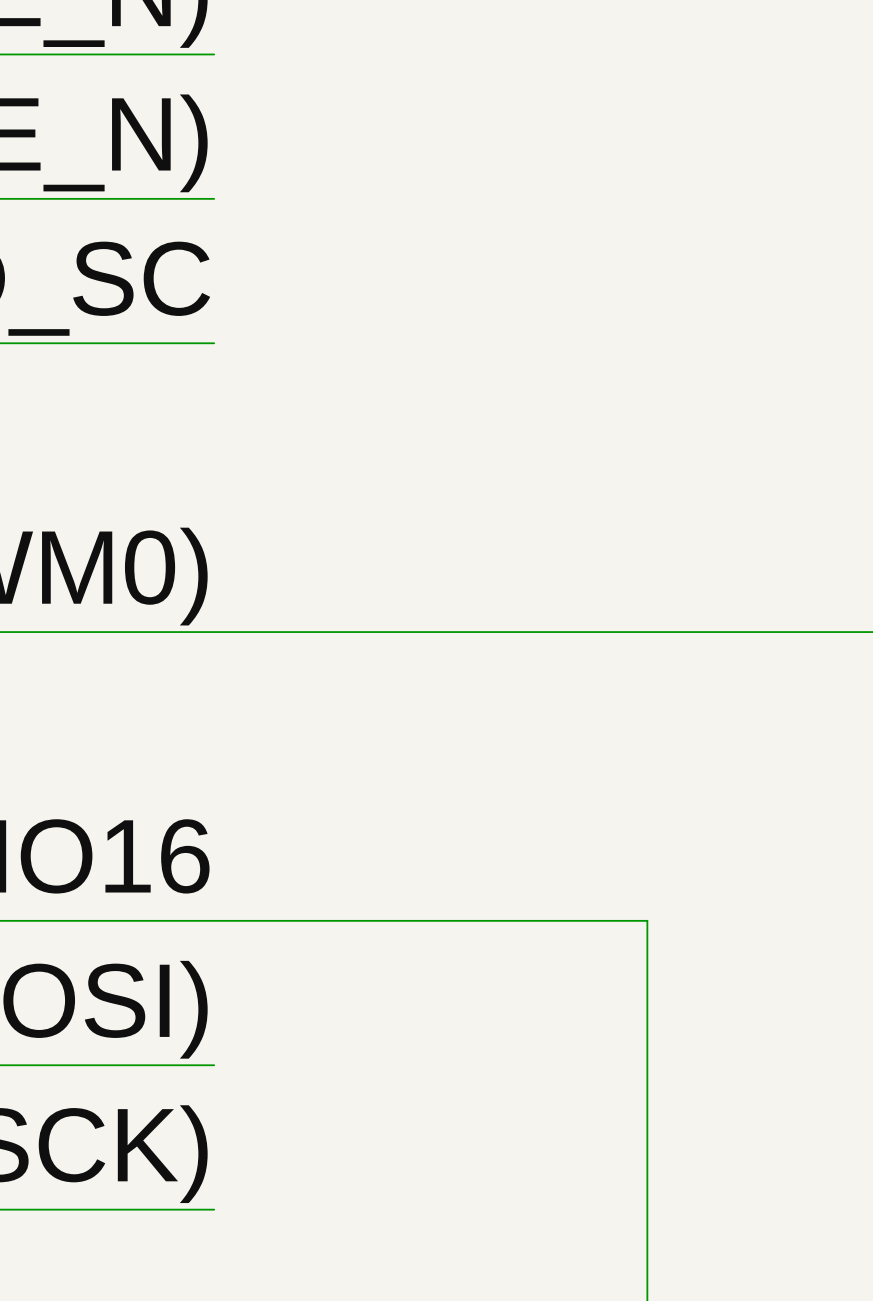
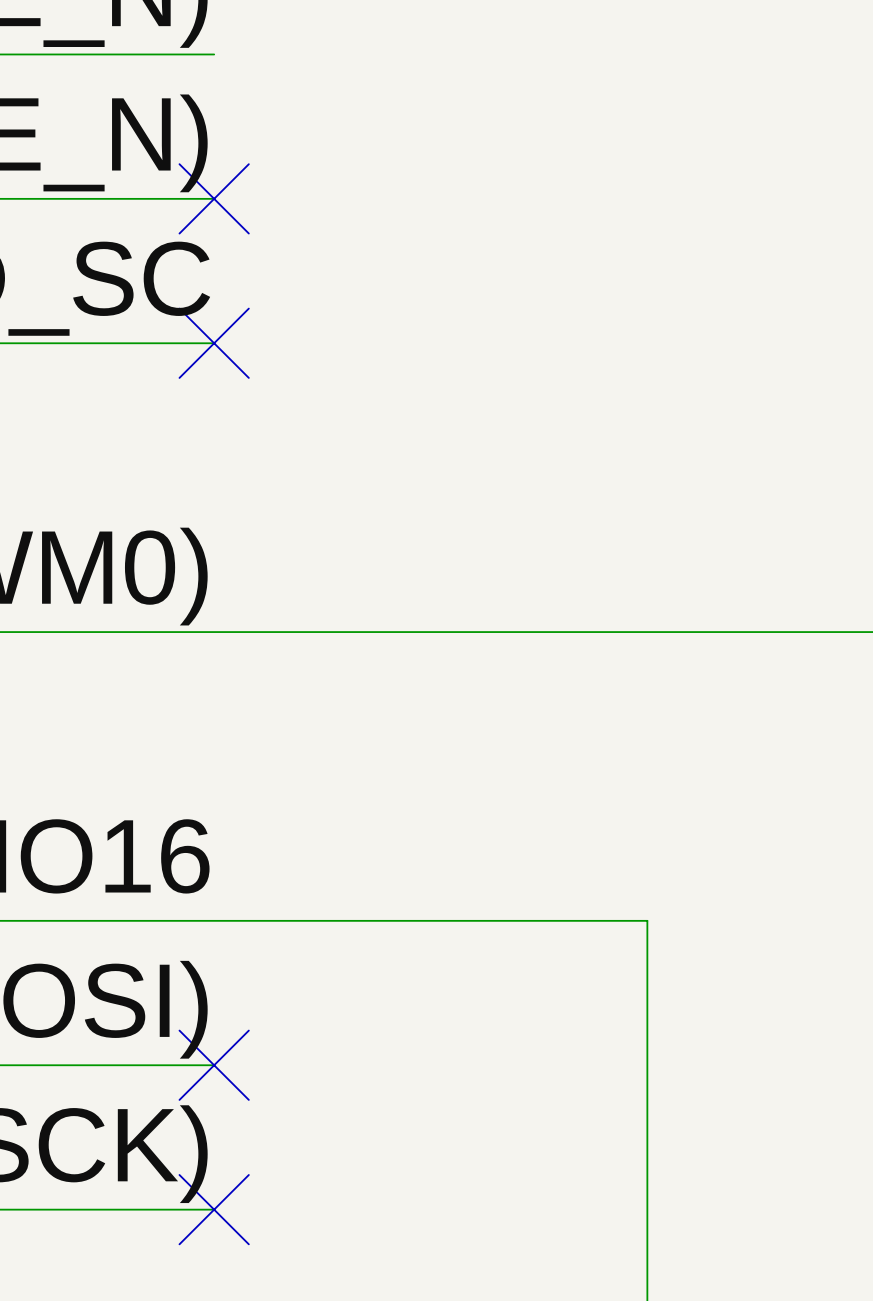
no-connect mark: none -> (214, 198)
no-connect mark: none -> (214, 343)
no-connect mark: none -> (214, 1065)
no-connect mark: none -> (214, 1209)

